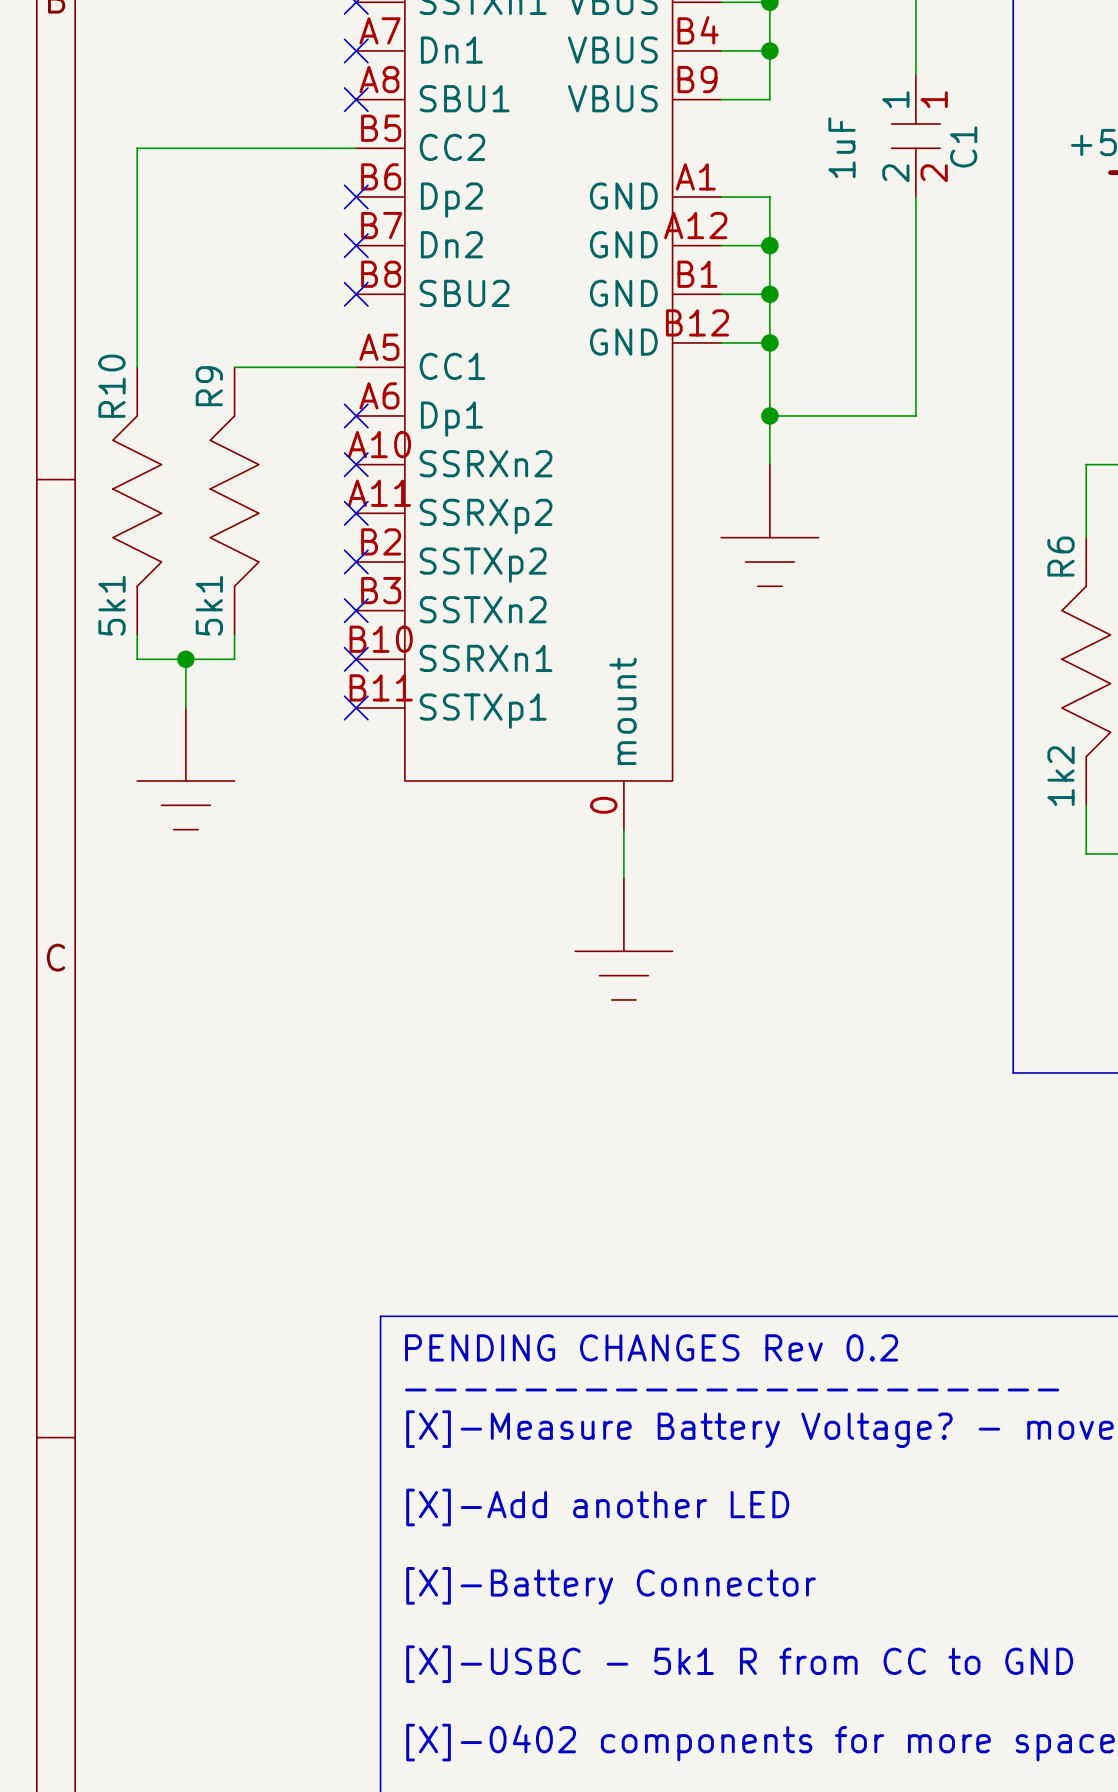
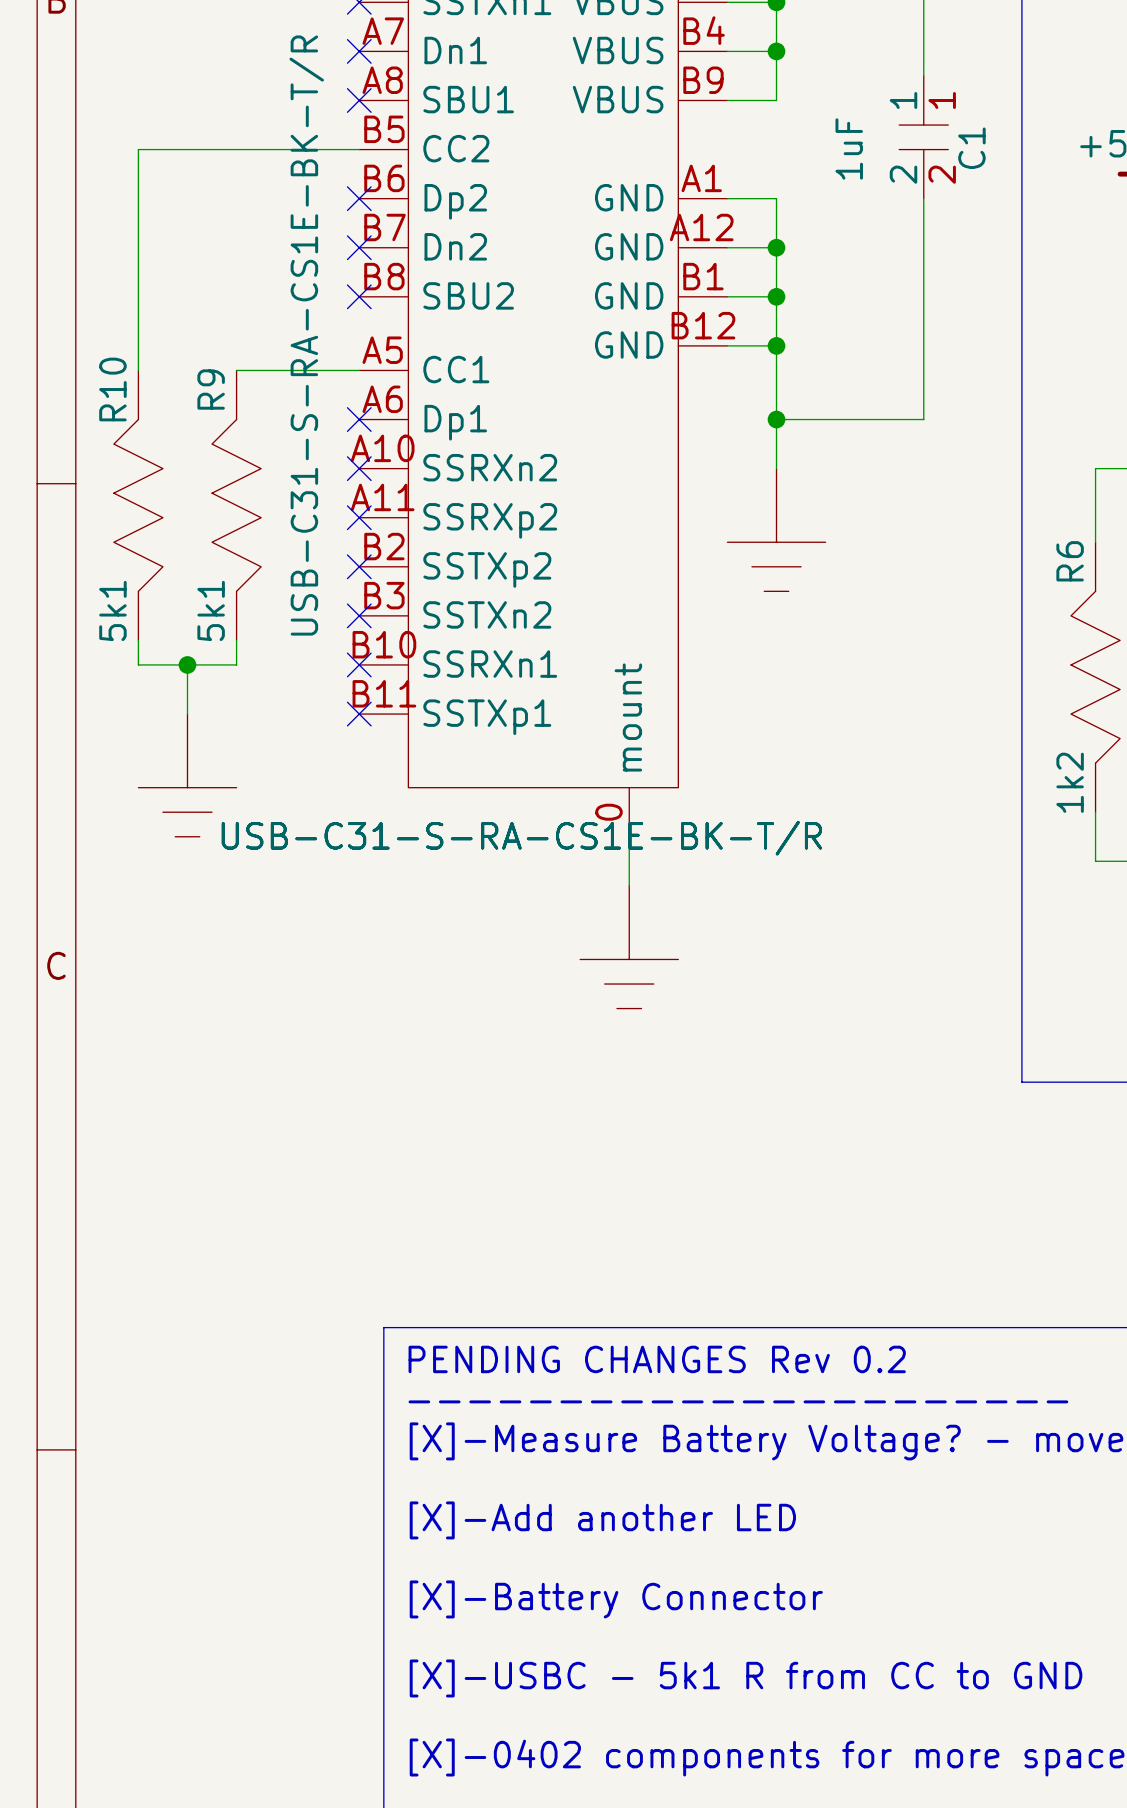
part value: none -> USB-C31-S-RA-CS1E-BK-T/R (306, 335)
part text: none -> USB-C31-S-RA-CS1E-BK-T/R (521, 838)
part text: none -> USB-C31-S-RA-CS1E-BK-T/R (521, 838)

